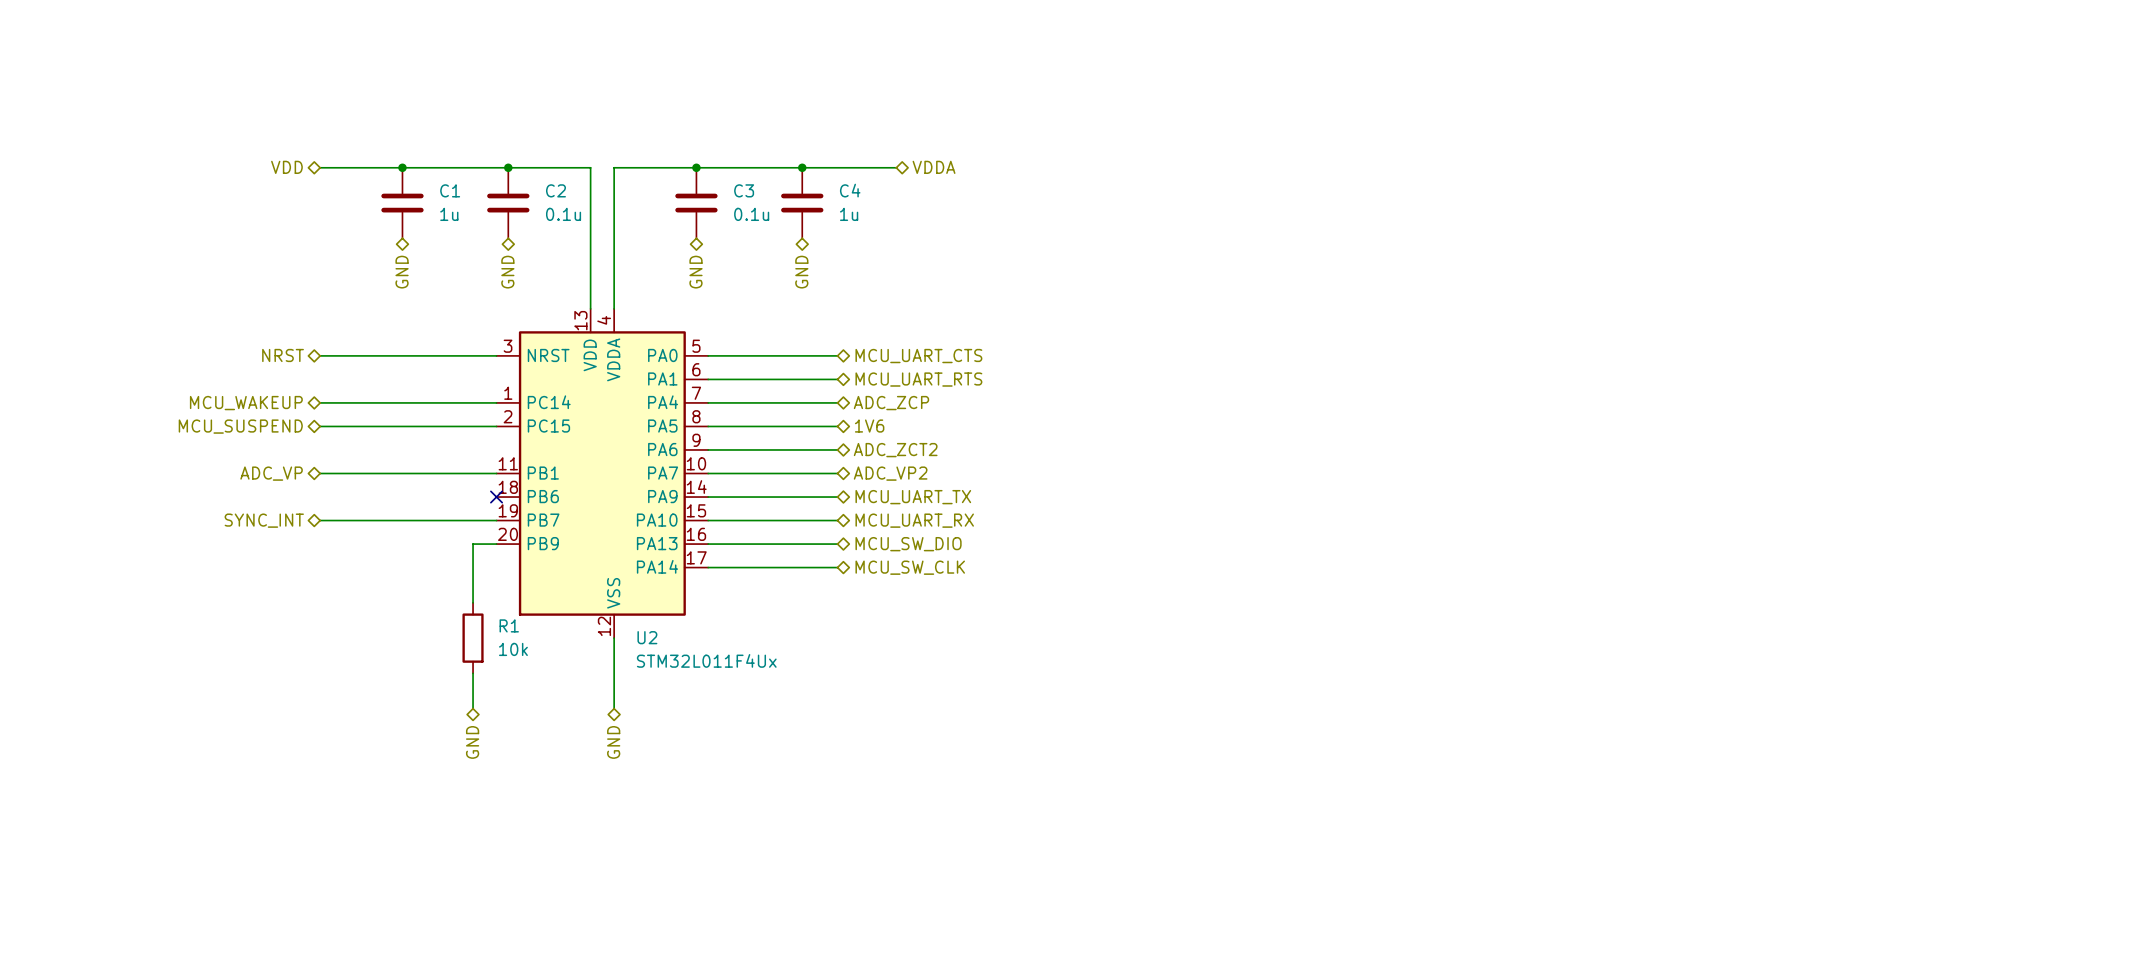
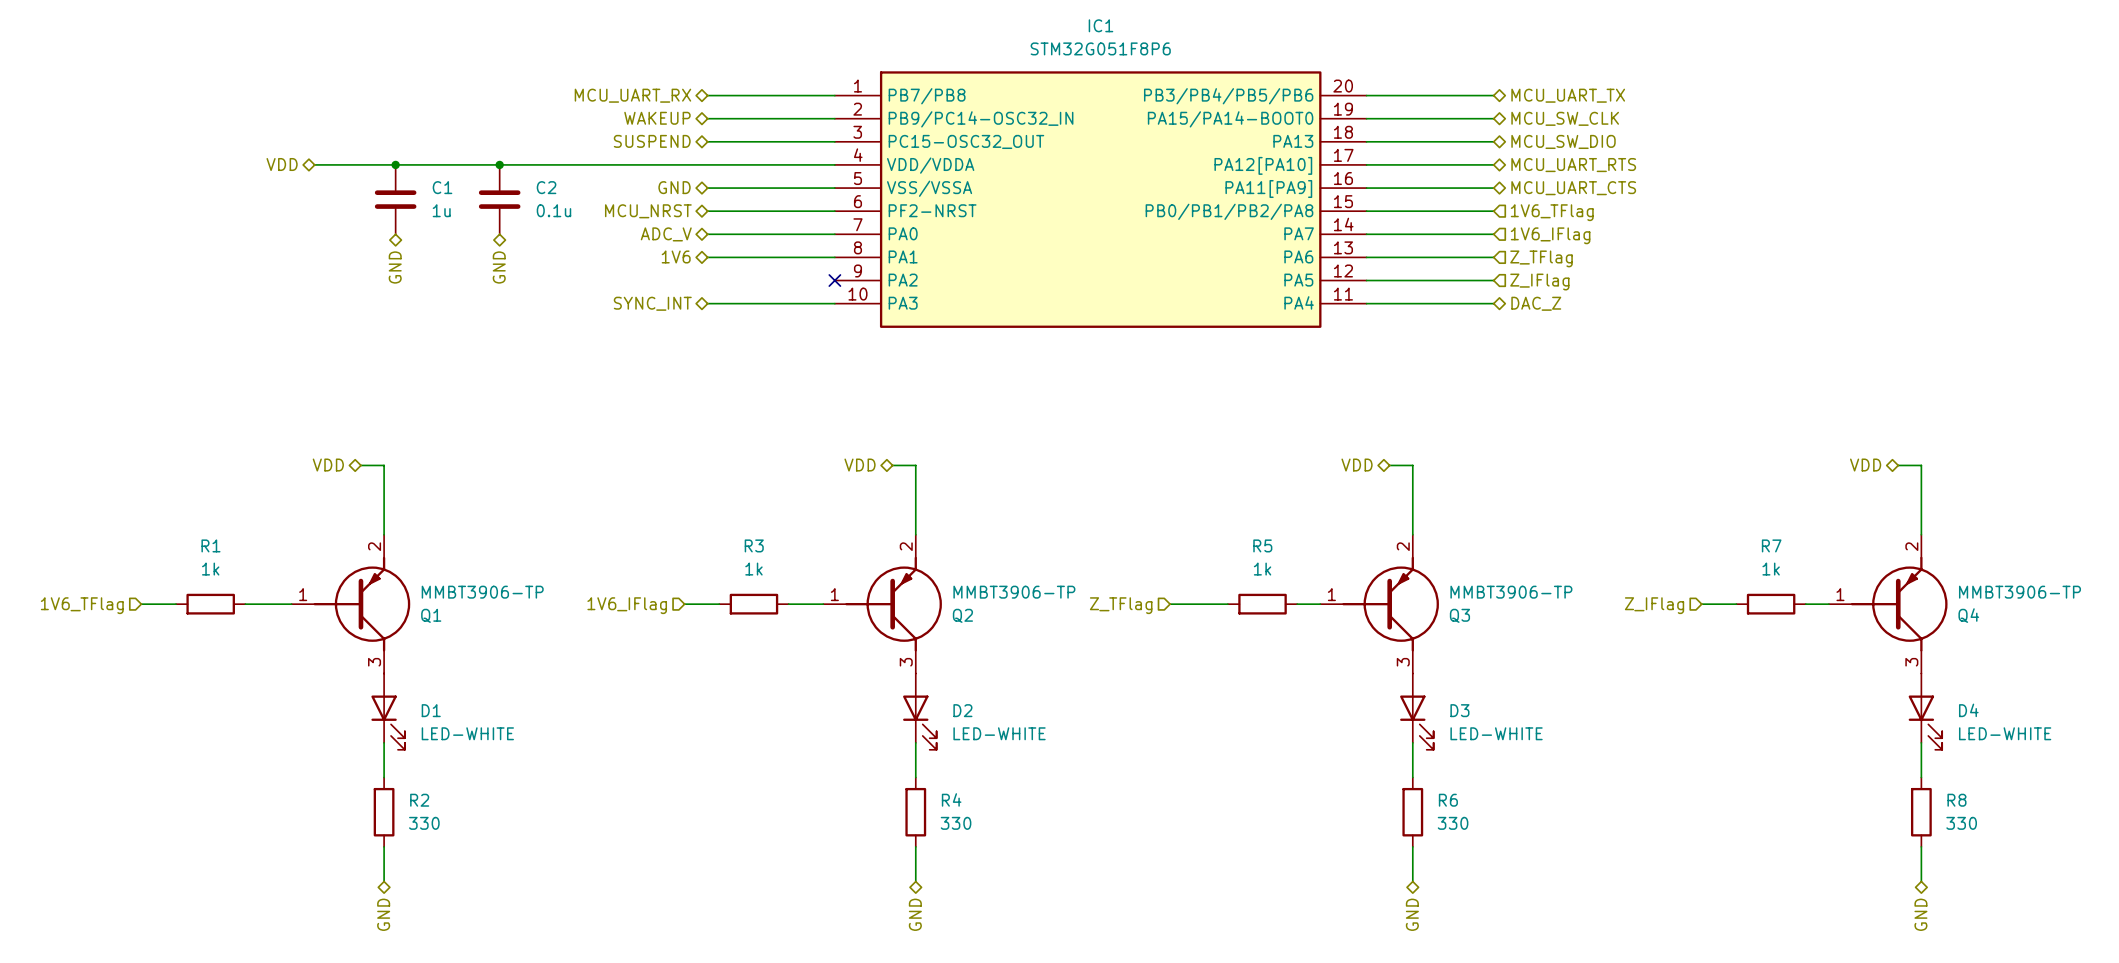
hierarchical label: none -> MCU_UART_RX (632, 95)
wire: none -> (707, 95) (834, 95)
wire: none -> (1366, 95) (1493, 95)
hierarchical label: none -> MCU_UART_TX (1568, 95)
hierarchical label: none -> WAKEUP (657, 118)
wire: none -> (707, 118) (834, 118)
wire: none -> (1366, 118) (1493, 118)
hierarchical label: none -> MCU_SW_CLK (1565, 118)
hierarchical label: none -> SUSPEND (652, 141)
wire: none -> (1366, 141) (1493, 141)
hierarchical label: none -> MCU_SW_DIO (1563, 141)
wire: (590, 167) (590, 308) -> (580, 164) (603, 164)
wire: (614, 167) (614, 308) -> none
junction: (696, 167) -> none
junction: (802, 167) -> none
hierarchical label: VDDA (934, 167) -> none
wire: none -> (1366, 164) (1493, 164)
hierarchical label: none -> MCU_UART_RTS (1573, 165)
hierarchical label: none -> GND (674, 187)
wire: none -> (1366, 188) (1493, 188)
hierarchical label: none -> MCU_UART_CTS (1573, 188)
C3: 0.1u (696, 203) -> none
C4: 1u (802, 203) -> none
IC1: none -> STM32G051F8P6 (1100, 199)
hierarchical label: none -> MCU_NRST (648, 211)
wire: none -> (1366, 211) (1493, 211)
hierarchical label: none -> 1V6_TFlag (1552, 212)
hierarchical label: none -> ADC_V (666, 234)
wire: none -> (1366, 234) (1493, 234)
hierarchical label: none -> 1V6_IFlag (1550, 235)
wire: none -> (1366, 257) (1493, 257)
hierarchical label: none -> Z_TFlag (1541, 258)
hierarchical label: GND (695, 272) -> none
hierarchical label: GND (801, 272) -> none
no-connect mark: none -> (834, 280)
wire: none -> (1366, 280) (1493, 280)
hierarchical label: none -> Z_IFlag (1539, 282)
wire: none -> (1366, 303) (1493, 303)
hierarchical label: none -> SYNC_INT (652, 303)
hierarchical label: none -> DAC_Z (1536, 303)
hierarchical label: NRST (283, 355) -> none
wire: (320, 355) (496, 355) -> none
wire: (708, 355) (837, 355) -> (707, 141) (834, 141)
hierarchical label: MCU_UART_CTS (918, 356) -> none
wire: (708, 379) (837, 379) -> none
hierarchical label: MCU_UART_RTS (918, 379) -> none
wire: (320, 402) (496, 402) -> none
wire: (708, 402) (837, 402) -> (707, 188) (834, 188)
hierarchical label: MCU_WAKEUP (246, 403) -> none
hierarchical label: ADC_ZCP (891, 403) -> none
hierarchical label: MCU_SUSPEND (240, 426) -> none
wire: (320, 426) (496, 426) -> none
wire: (708, 426) (837, 426) -> (707, 211) (834, 211)
hierarchical label rotation: 0° (869, 426) -> 180° (676, 256)
hierarchical label position: 1V6 (869, 426) -> 1V6 (676, 256)
wire: (708, 449) (837, 449) -> (707, 234) (834, 234)
hierarchical label: ADC_ZCT2 (895, 450) -> none
hierarchical label: ADC_VP (271, 473) -> none
wire: (320, 473) (367, 473) -> (245, 604) (291, 604)
hierarchical label: none -> VDD (328, 465)
wire: (390, 473) (496, 473) -> (384, 465) (384, 534)
U2: STM32L011F4Ux (602, 473) -> none
wire: (708, 473) (837, 473) -> (707, 257) (834, 257)
hierarchical label: none -> VDD (860, 465)
hierarchical label: ADC_VP2 (890, 473) -> none
wire: none -> (892, 465) (915, 465) (915, 534)
hierarchical label: none -> VDD (1357, 465)
wire: none -> (1389, 465) (1412, 465) (1412, 534)
hierarchical label: none -> VDD (1865, 465)
wire: none -> (1898, 465) (1921, 465) (1921, 534)
no-connect mark: (496, 497) -> none
wire: (708, 497) (837, 497) -> none
hierarchical label: MCU_UART_TX (913, 497) -> none
hierarchical label: SYNC_INT (264, 520) -> none
wire: (320, 520) (496, 520) -> none
wire: (708, 520) (837, 520) -> (707, 303) (834, 303)
hierarchical label: MCU_UART_RX (914, 520) -> none
wire: (496, 544) (473, 544) (473, 602) -> none
wire: (708, 544) (837, 544) -> none
hierarchical label: MCU_SW_DIO (908, 544) -> none
wire: (708, 567) (837, 567) -> none
hierarchical label: MCU_SW_CLK (910, 567) -> none
wire: none -> (141, 604) (176, 604)
Q1: none -> MMBT3906-TP (350, 604)
wire: none -> (684, 604) (719, 604)
R3: none -> 1k (753, 604)
wire: none -> (788, 604) (823, 604)
Q2: none -> MMBT3906-TP (882, 604)
wire: none -> (1170, 604) (1227, 604)
R5: none -> 1k (1262, 604)
wire: none -> (1297, 604) (1320, 604)
Q3: none -> MMBT3906-TP (1379, 604)
wire: none -> (1701, 604) (1736, 604)
R7: none -> 1k (1771, 604)
wire: none -> (1805, 604) (1828, 604)
Q4: none -> MMBT3906-TP (1888, 604)
hierarchical label: none -> 1V6_TFlag (82, 605)
hierarchical label: none -> 1V6_IFlag (627, 605)
hierarchical label: none -> Z_TFlag (1121, 605)
hierarchical label: none -> Z_IFlag (1654, 605)
R1 name position: R1 (509, 625) -> R1 (210, 545)
R1 rotation: 0° (473, 638) -> 90° clockwise (210, 604)
R1 position: (473, 638) -> (210, 604)
wire: (614, 638) (614, 708) -> none
R1 value: 10k (513, 649) -> 1k (210, 569)
wire: (473, 673) (473, 708) -> (384, 742) (384, 777)
D1: none -> LED-WHITE (388, 711)
D2: none -> LED-WHITE (919, 711)
D3: none -> LED-WHITE (1416, 711)
D4: none -> LED-WHITE (1925, 711)
hierarchical label: GND (472, 742) -> none
hierarchical label: GND (613, 742) -> none
wire: none -> (915, 742) (915, 777)
wire: none -> (1412, 742) (1412, 777)
wire: none -> (1921, 742) (1921, 777)
R2: none -> 330 (384, 812)
R4: none -> 330 (915, 812)
R6: none -> 330 (1412, 812)
R8: none -> 330 (1921, 812)
wire: none -> (384, 846) (384, 881)
wire: none -> (915, 846) (915, 881)
wire: none -> (1412, 846) (1412, 881)
wire: none -> (1921, 846) (1921, 881)
hierarchical label: none -> GND (383, 914)
hierarchical label: none -> GND (915, 914)
hierarchical label: none -> GND (1412, 914)
hierarchical label: none -> GND (1920, 914)

